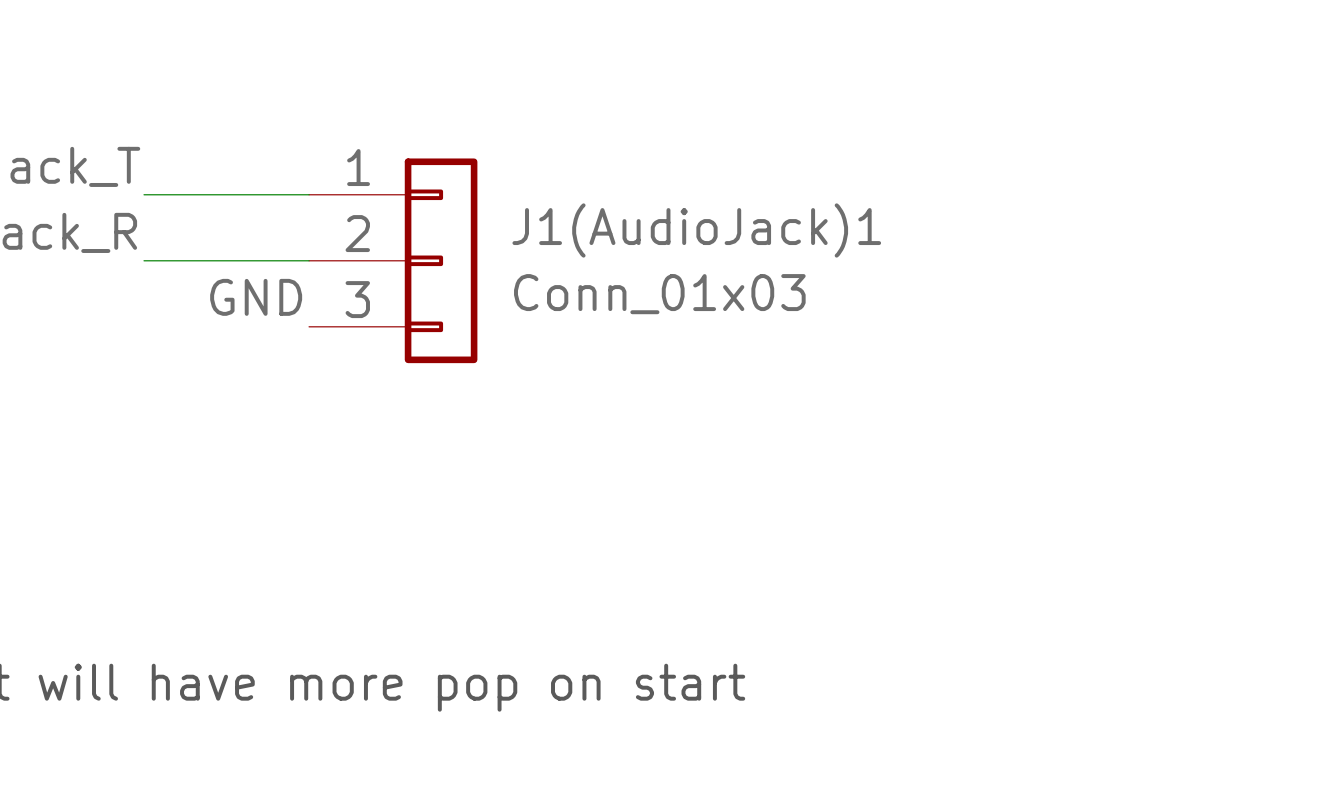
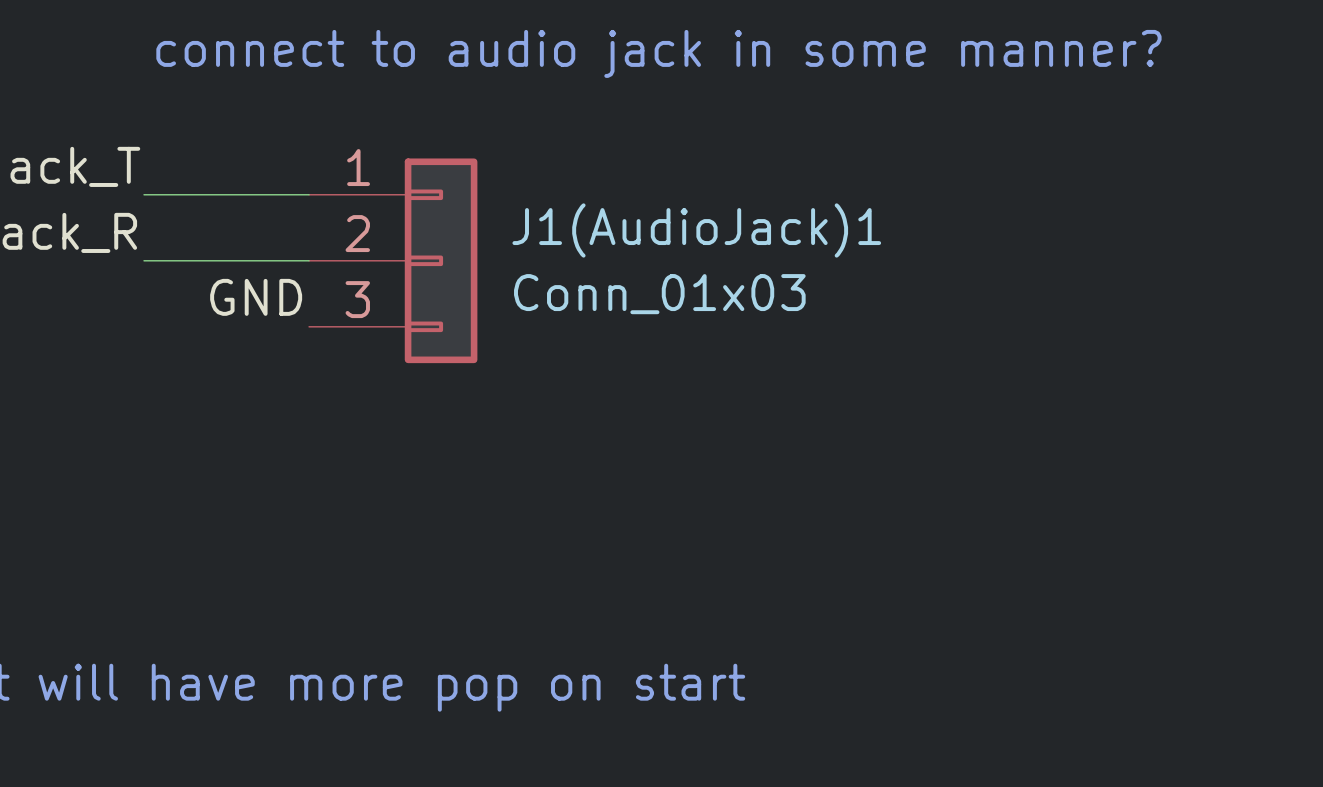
text: none -> connect to audio jack in some manner? (658, 53)

